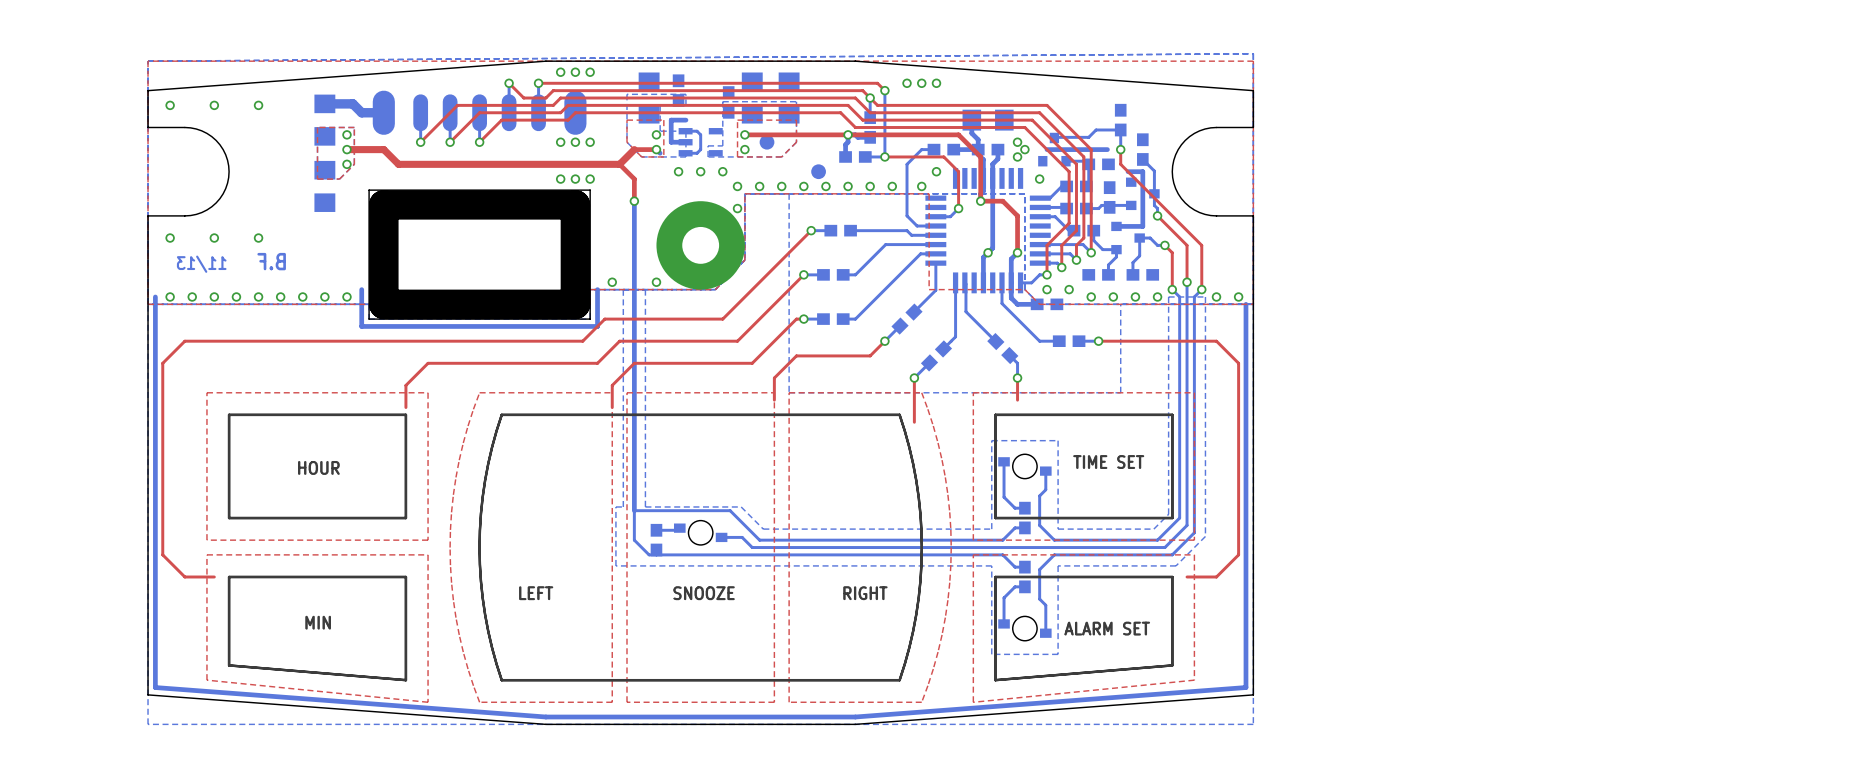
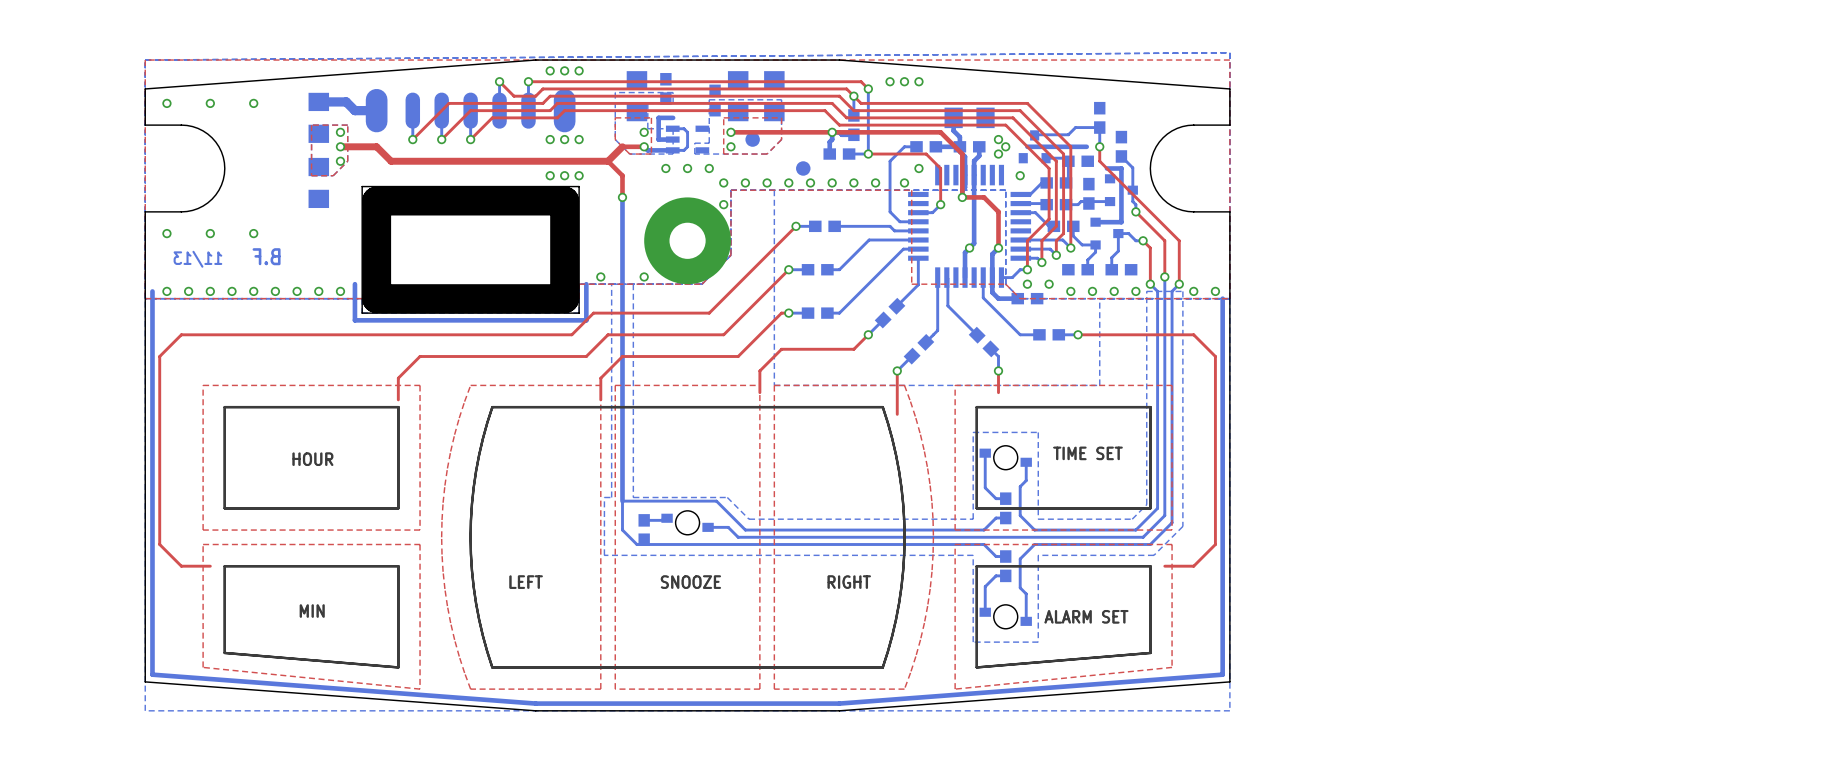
bottom track: none -> (647, 150) (672, 150)

